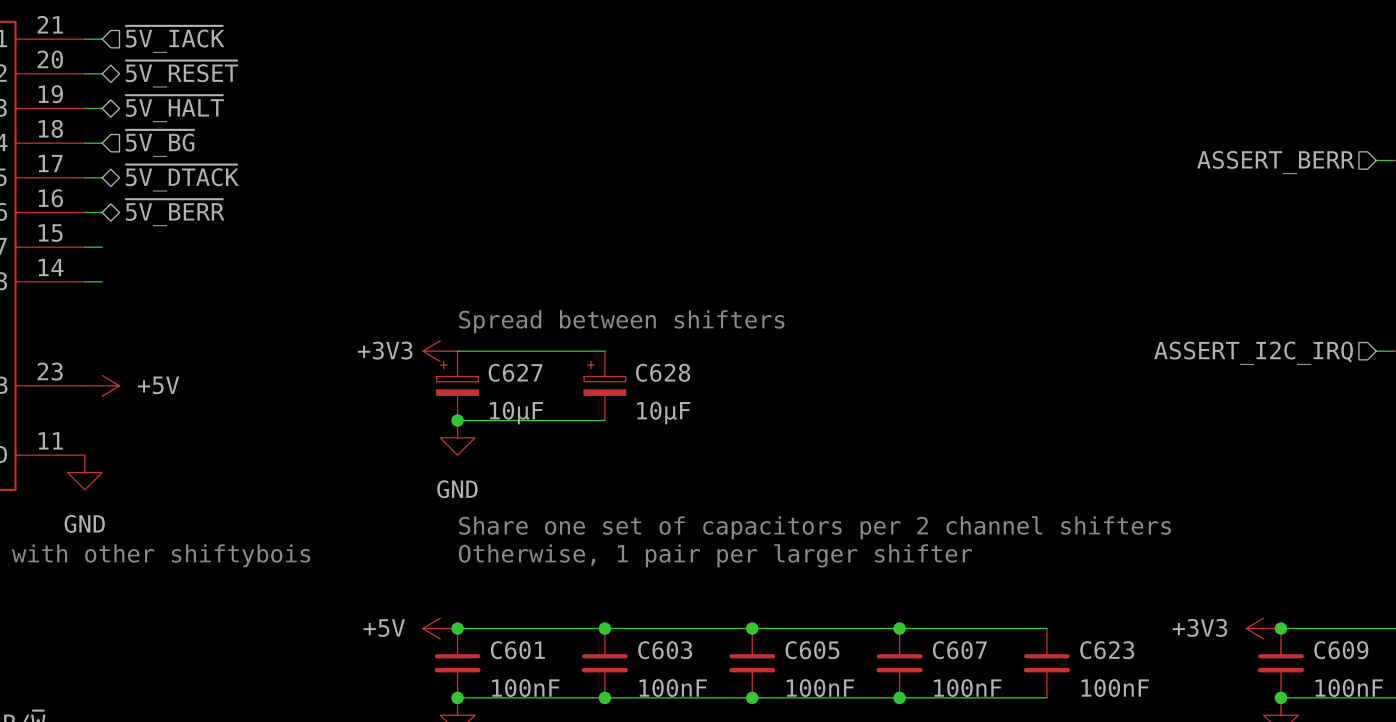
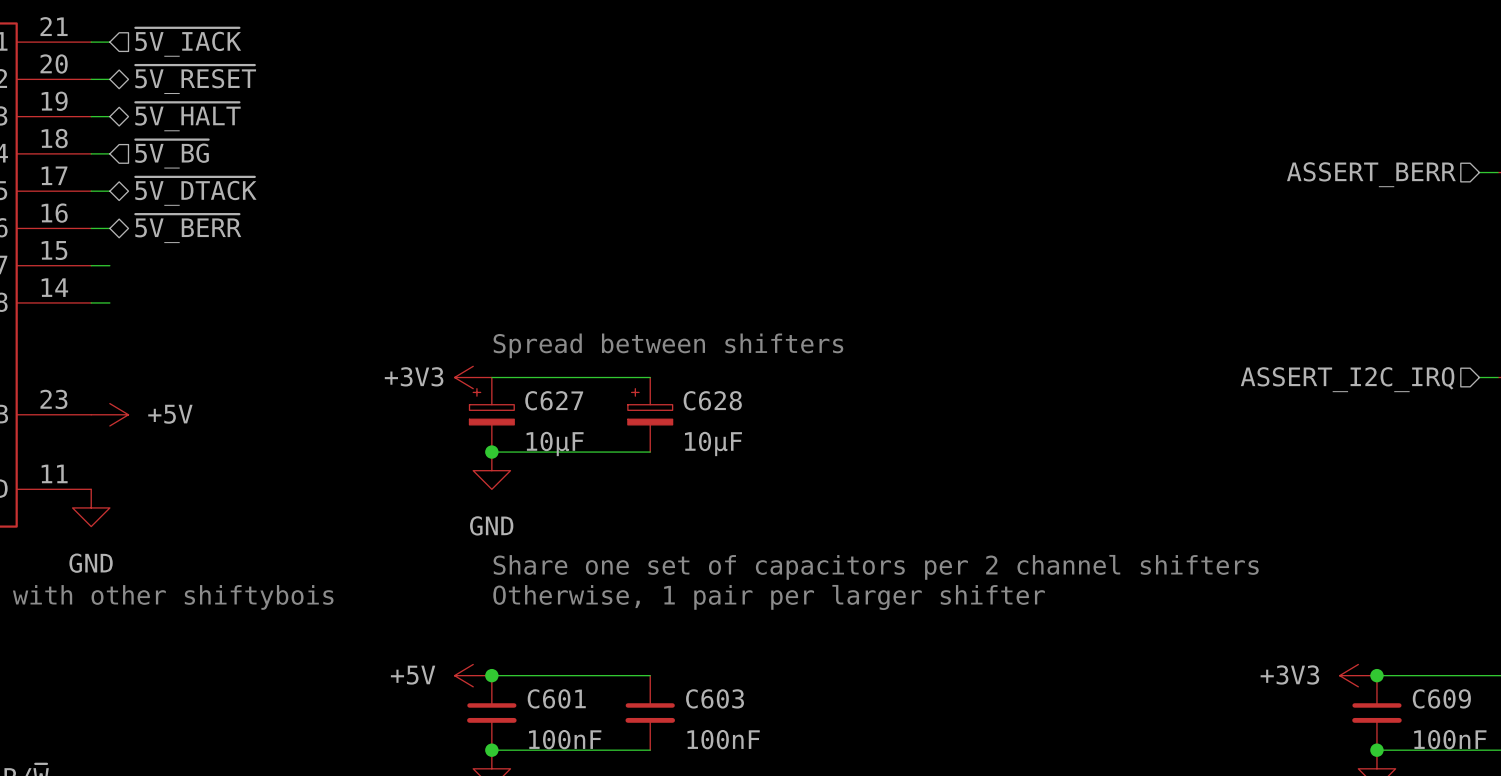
wire: (604, 628) (1046, 628) -> none
junction: (604, 628) -> none
junction: (752, 628) -> none
junction: (899, 628) -> none
C605: 100nF (752, 663) -> none
C607: 100nF (899, 663) -> none
C623: 100nF (1046, 663) -> none
wire: (604, 697) (1046, 697) -> none
junction: (604, 697) -> none
junction: (752, 697) -> none
junction: (899, 697) -> none

